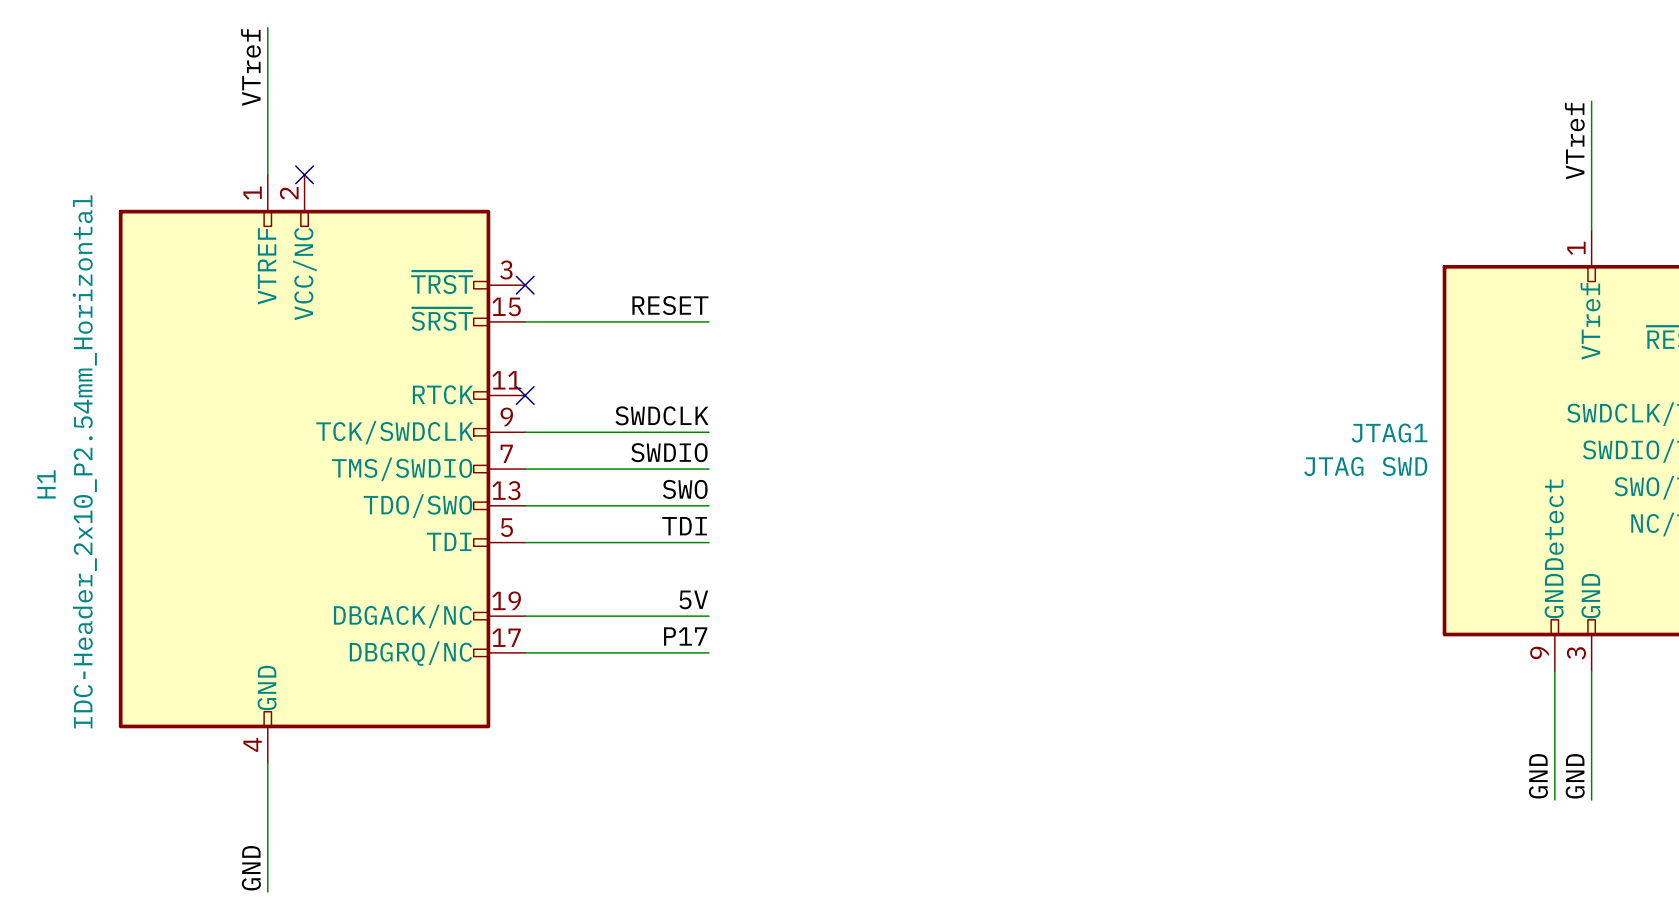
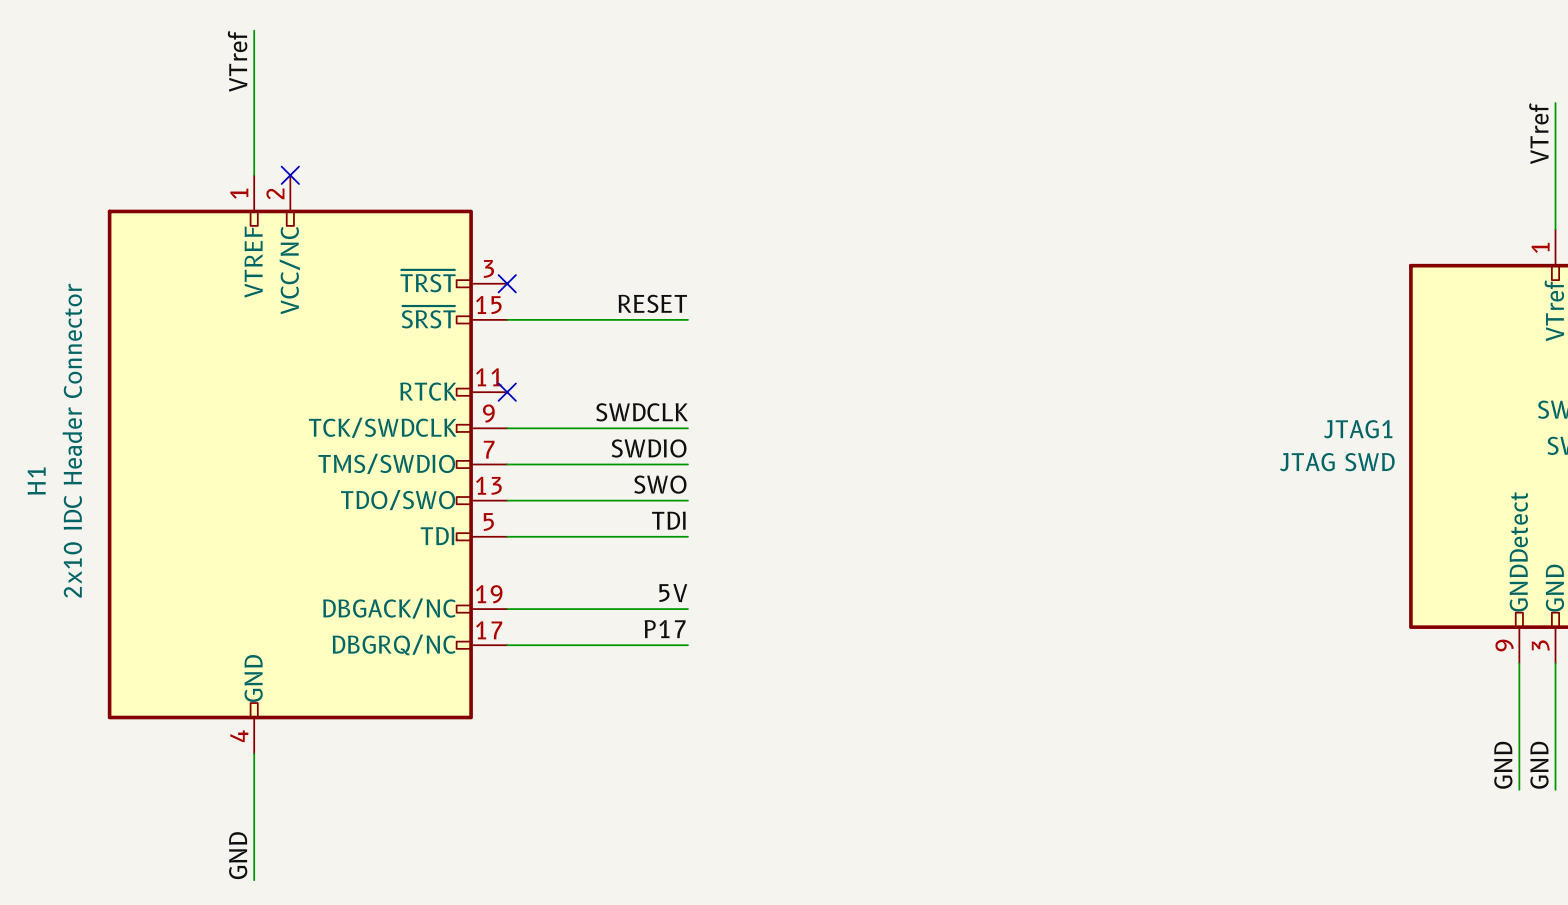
H1 value: IDC-Header_2x10_P2.54mm_Horizontal (84, 461) -> 2x10 IDC Header Connector (72, 440)

